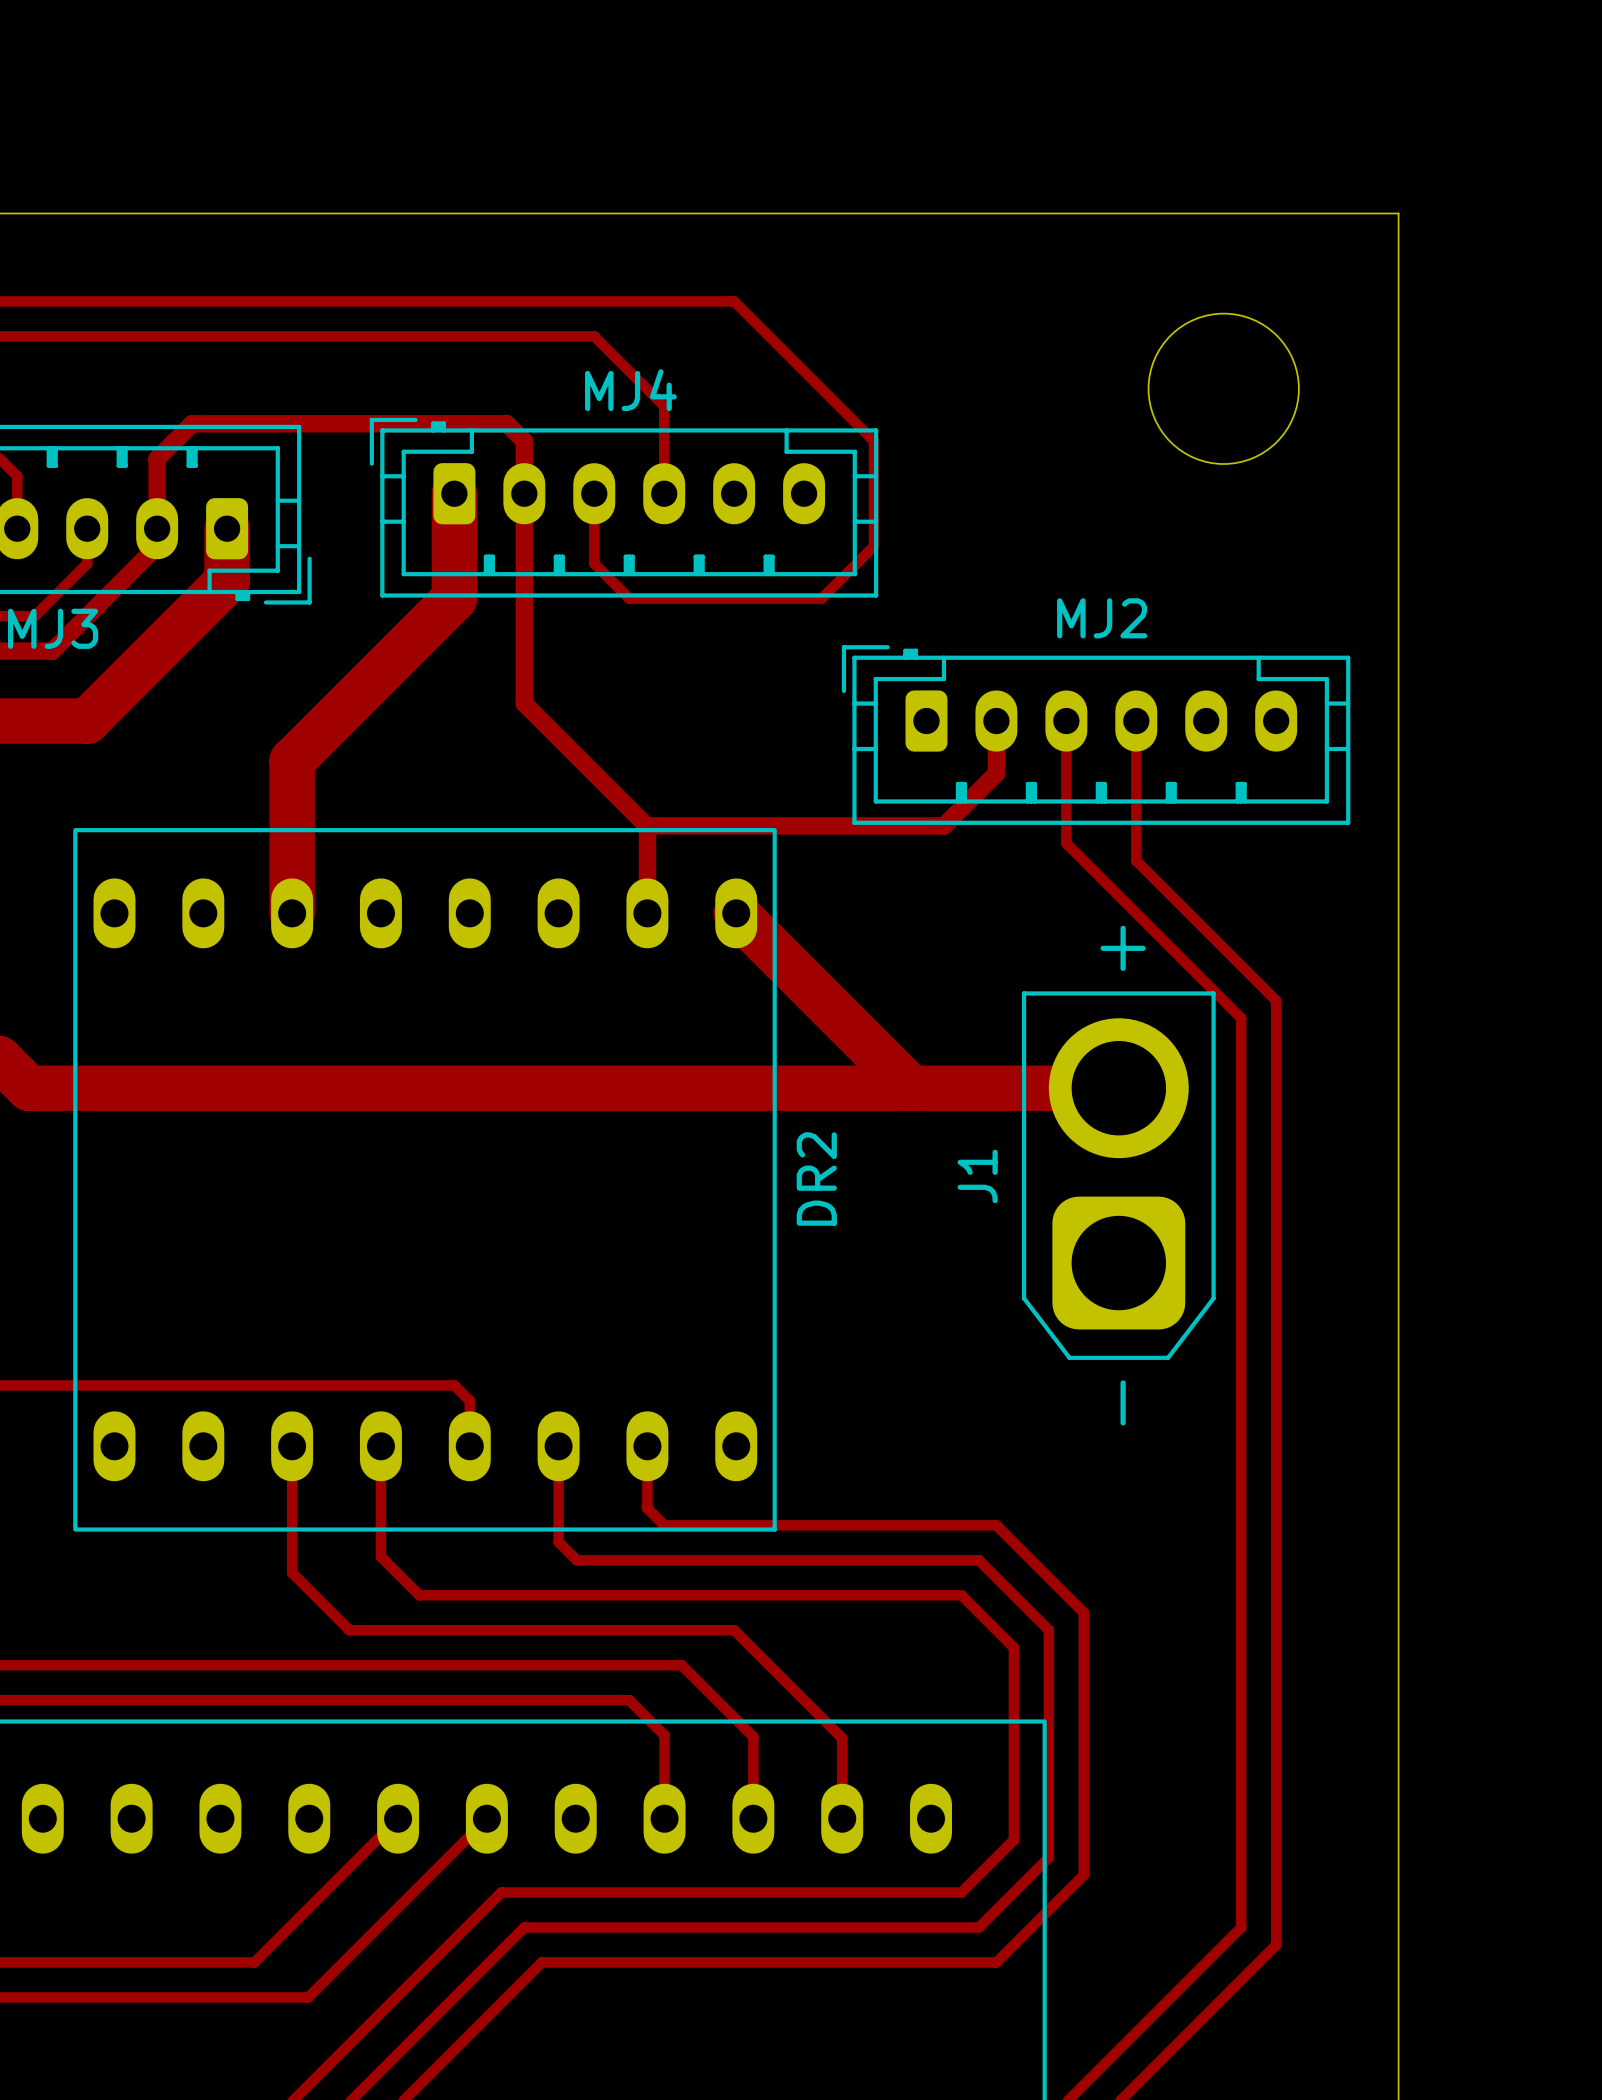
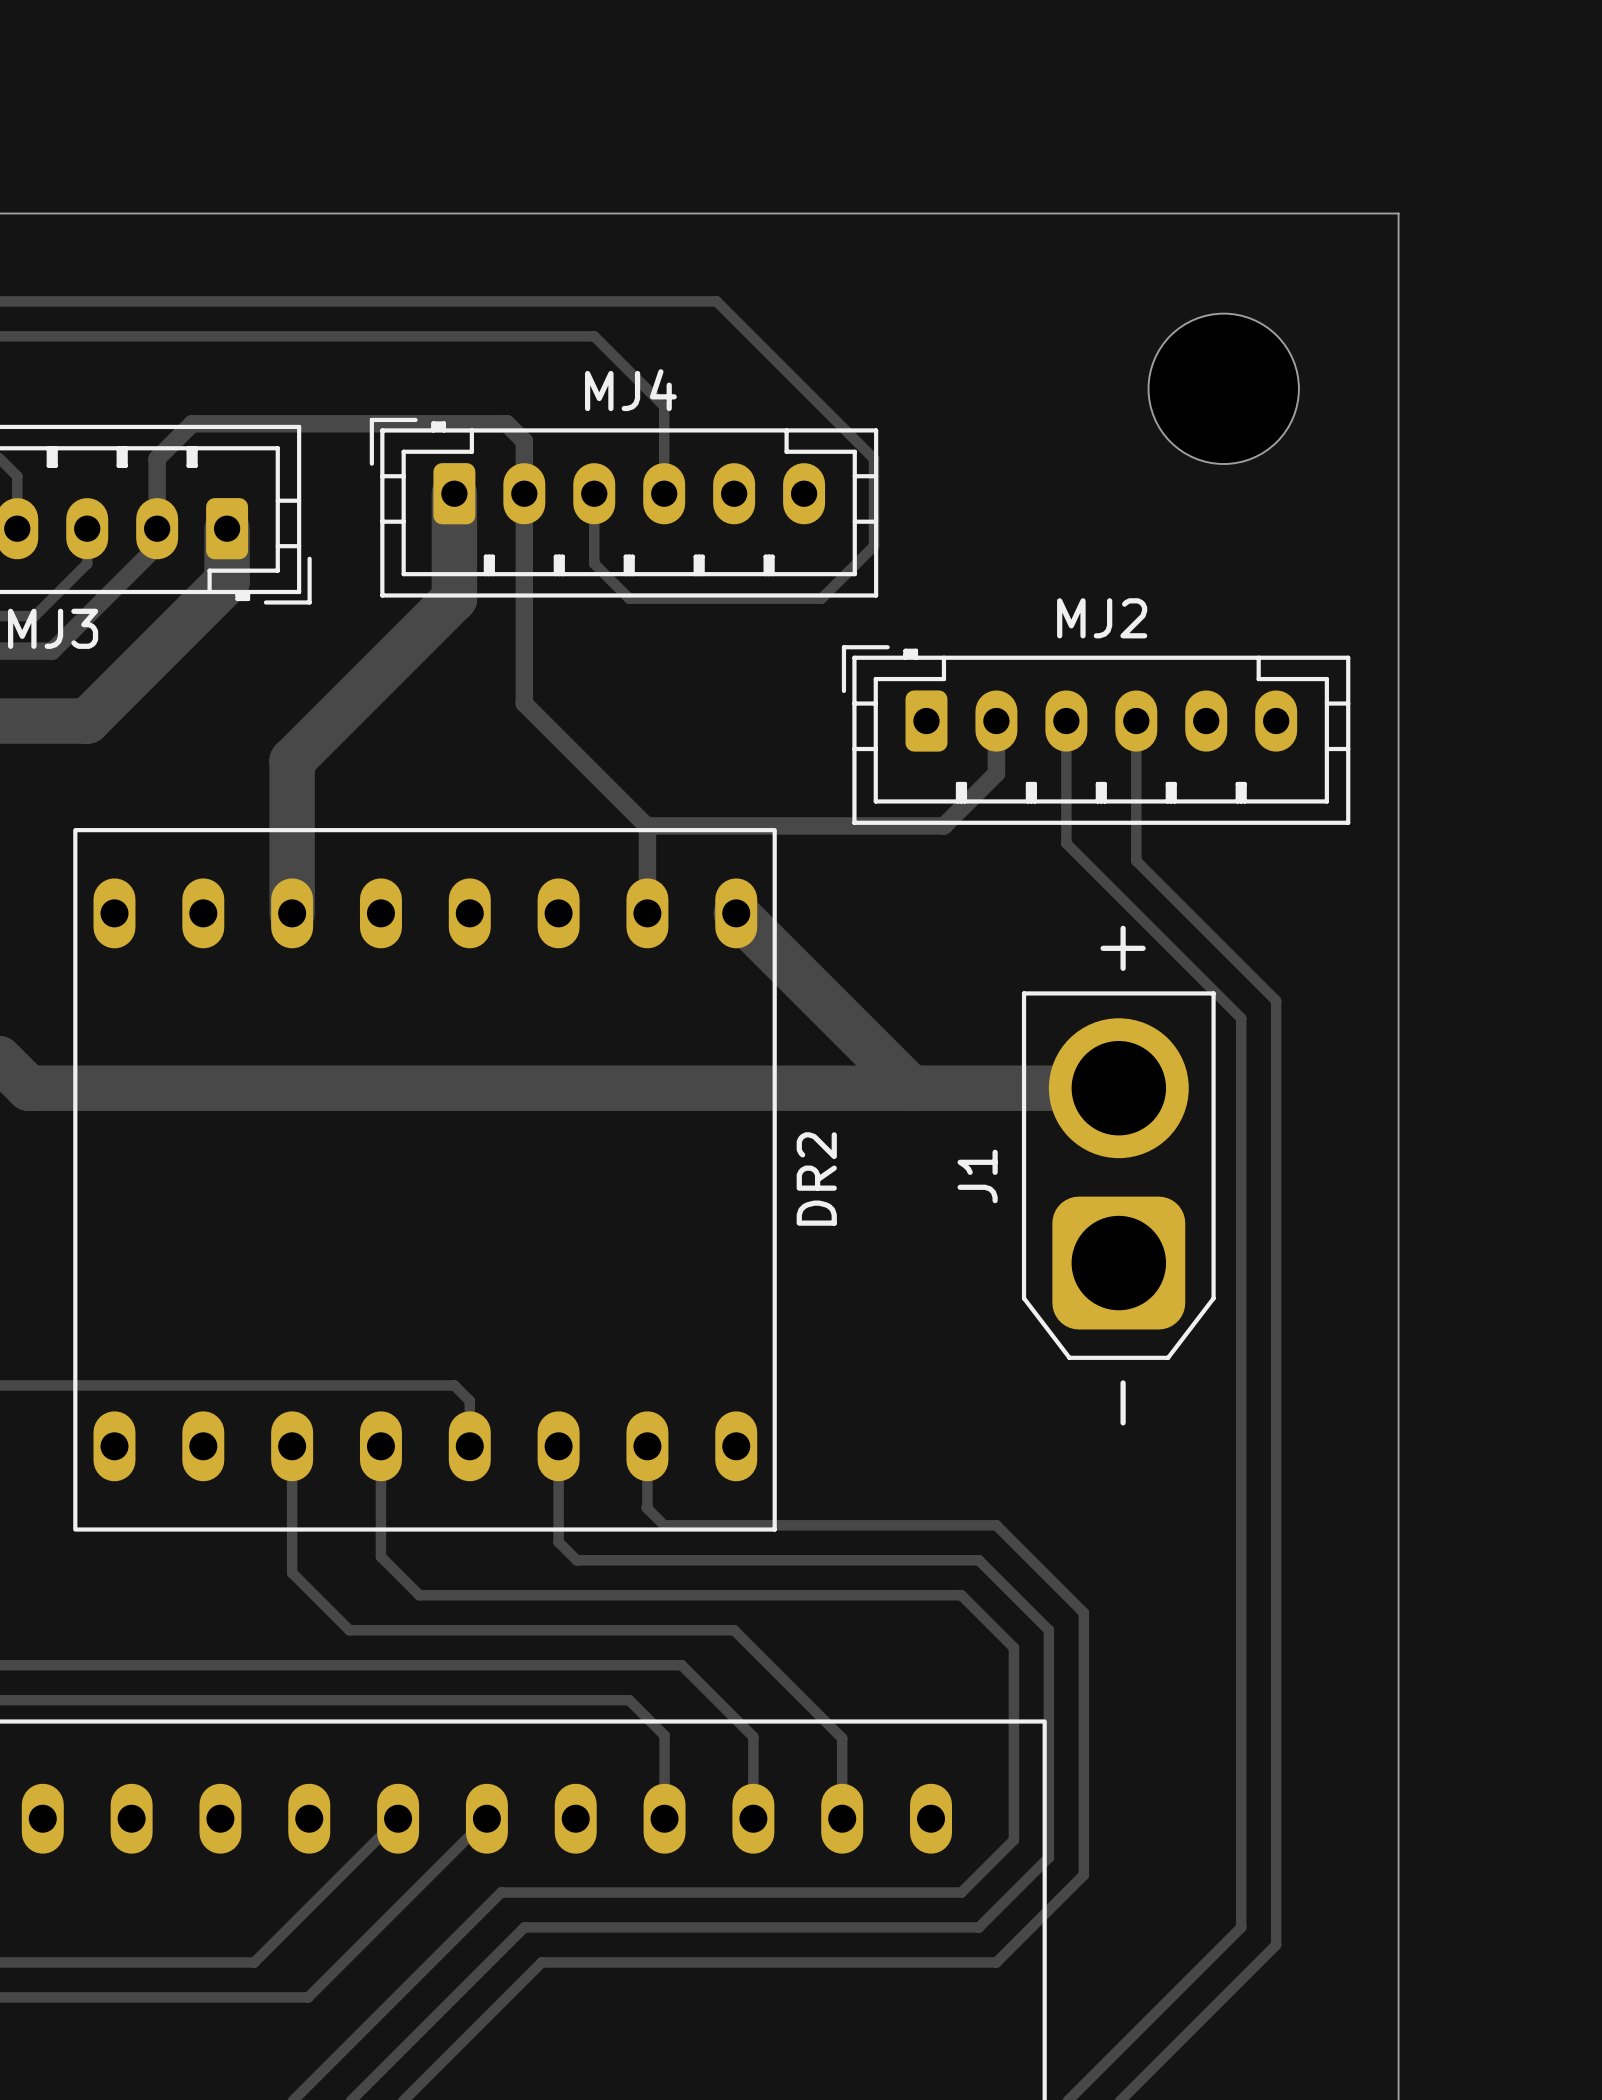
track: (716, 301) (734, 301) (874, 441) (874, 458) -> (716, 301) (874, 458)

